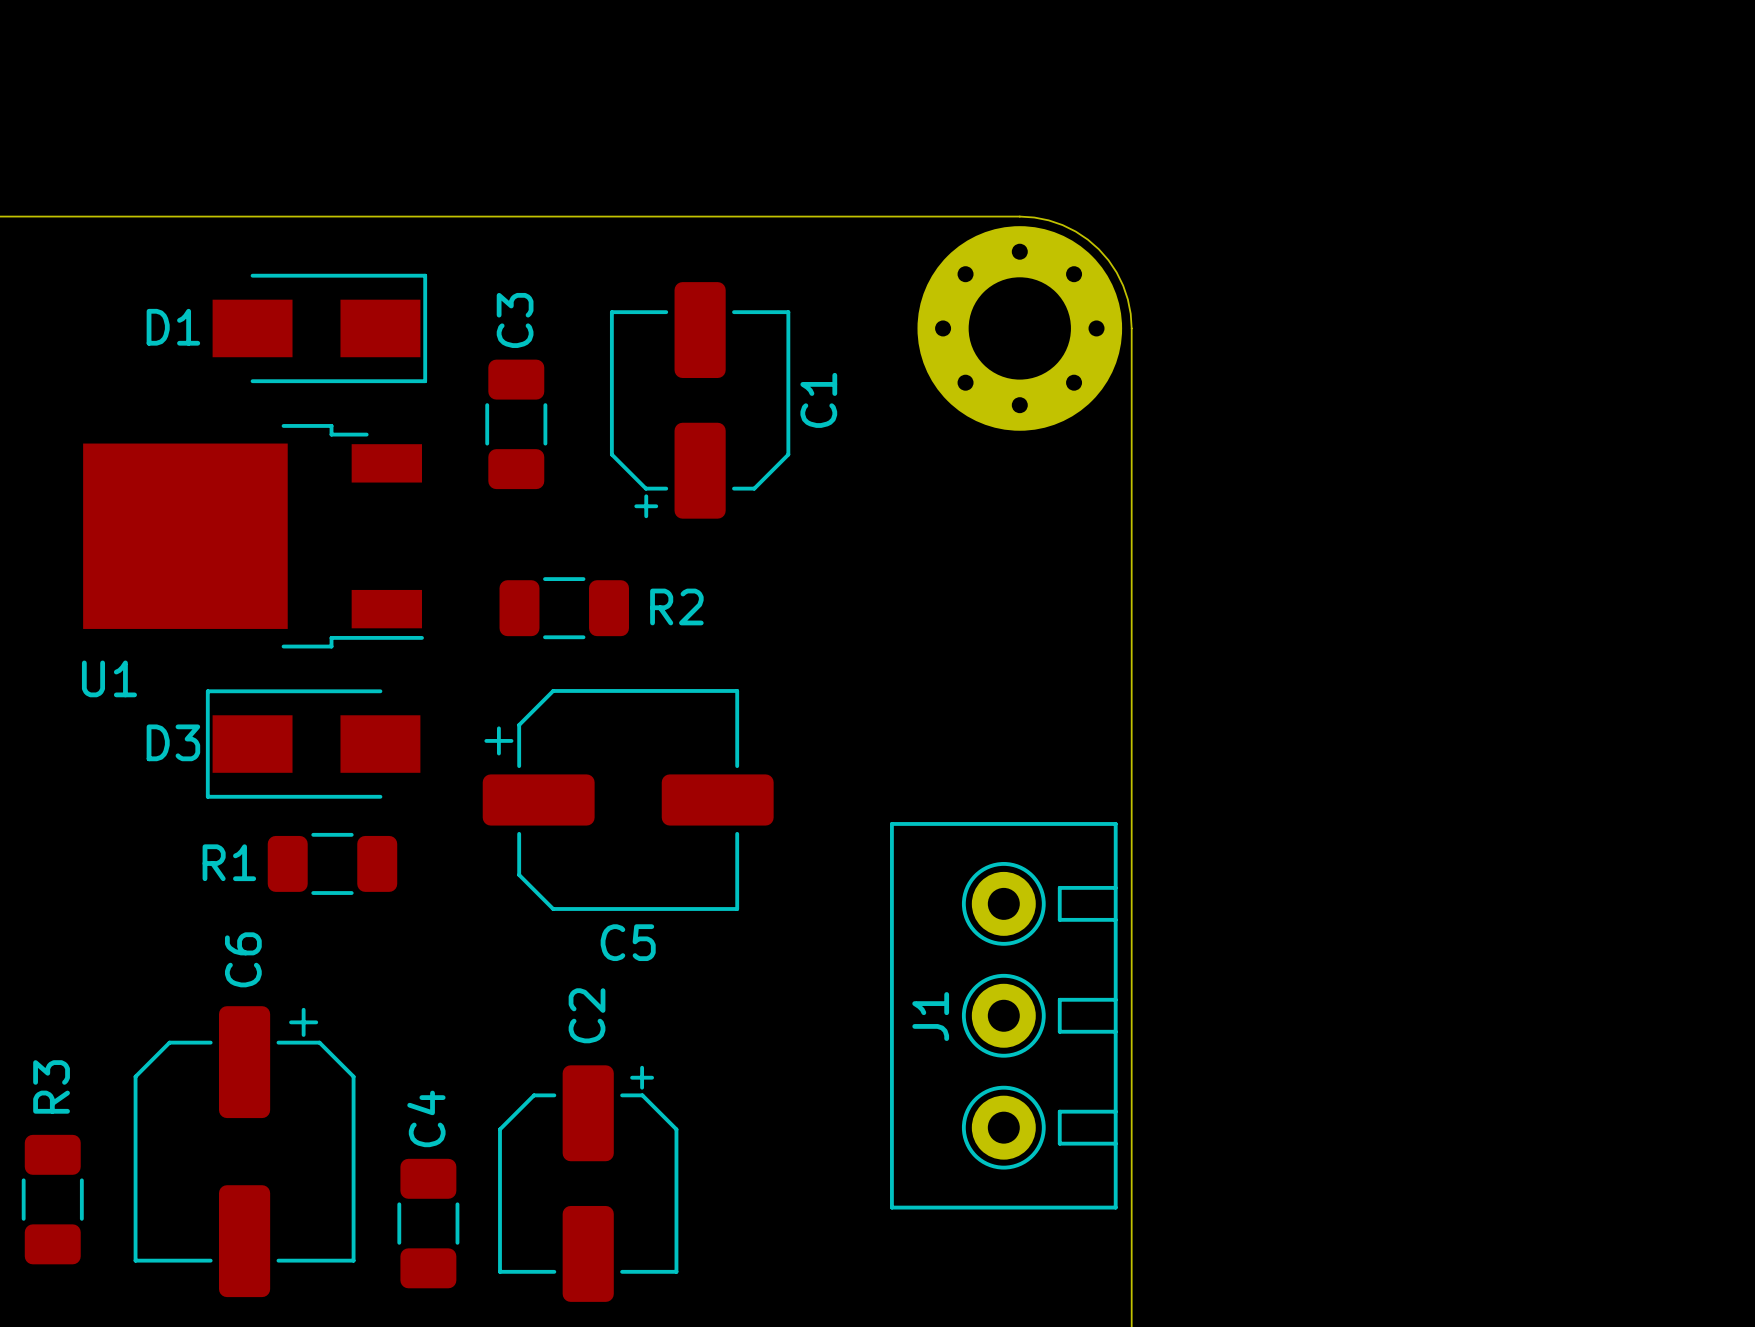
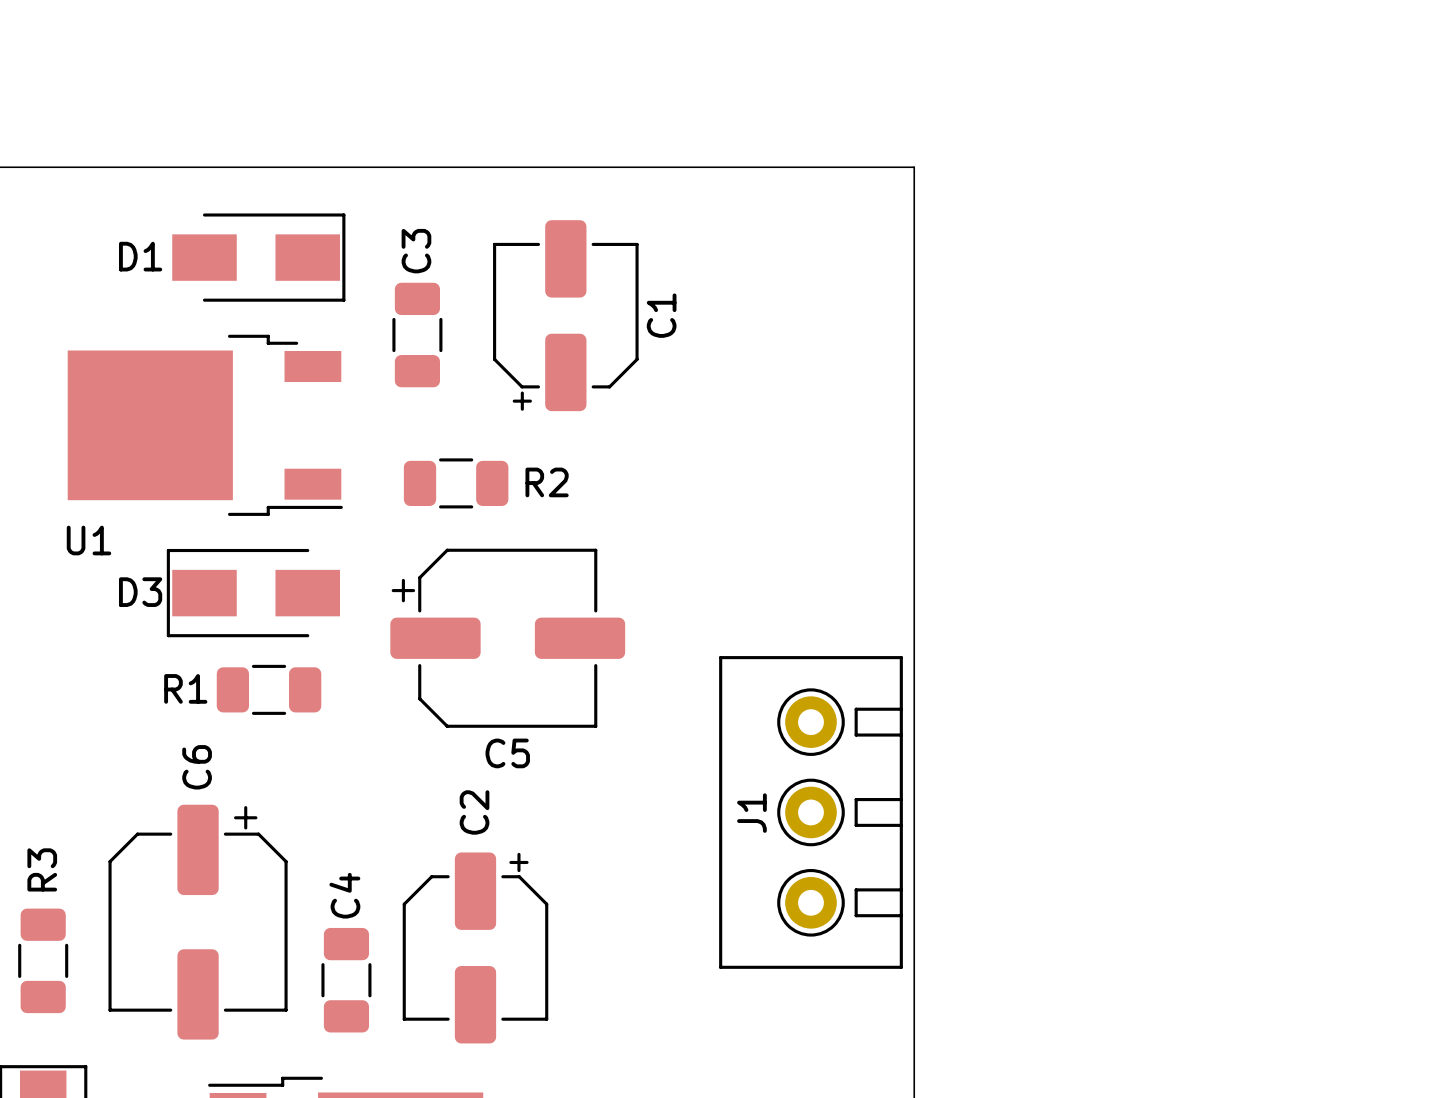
board edge: (1019, 216) (1048, 220) (1062, 225) (1075, 231) (1098, 249) (1108, 260) (1123, 285) (1127, 299) (1131, 328) -> (823, 167) (914, 167) (914, 257)
part: (1019, 328) -> none

